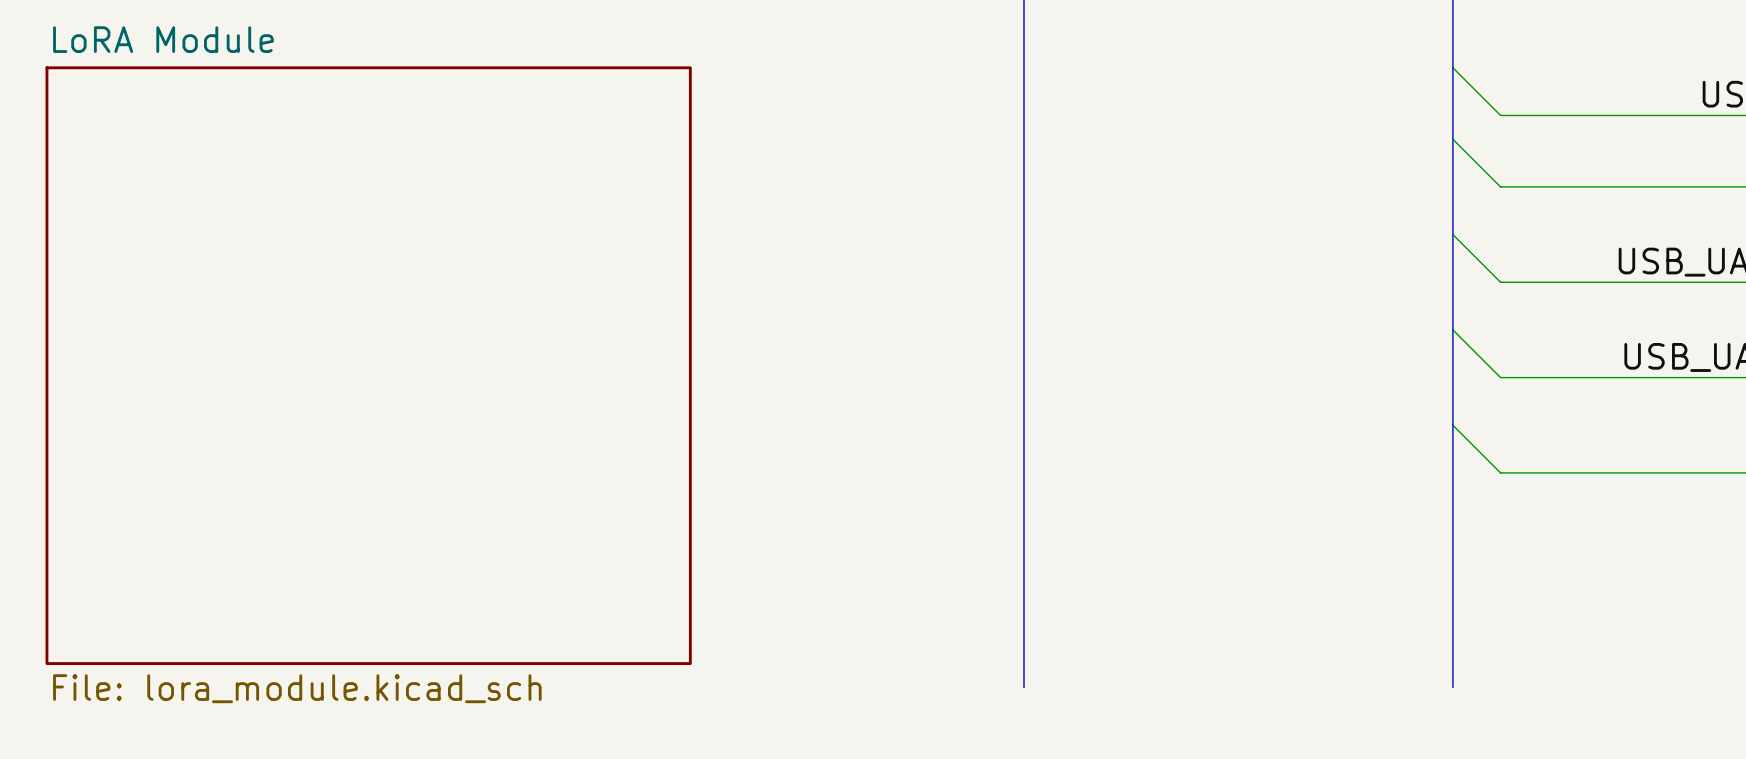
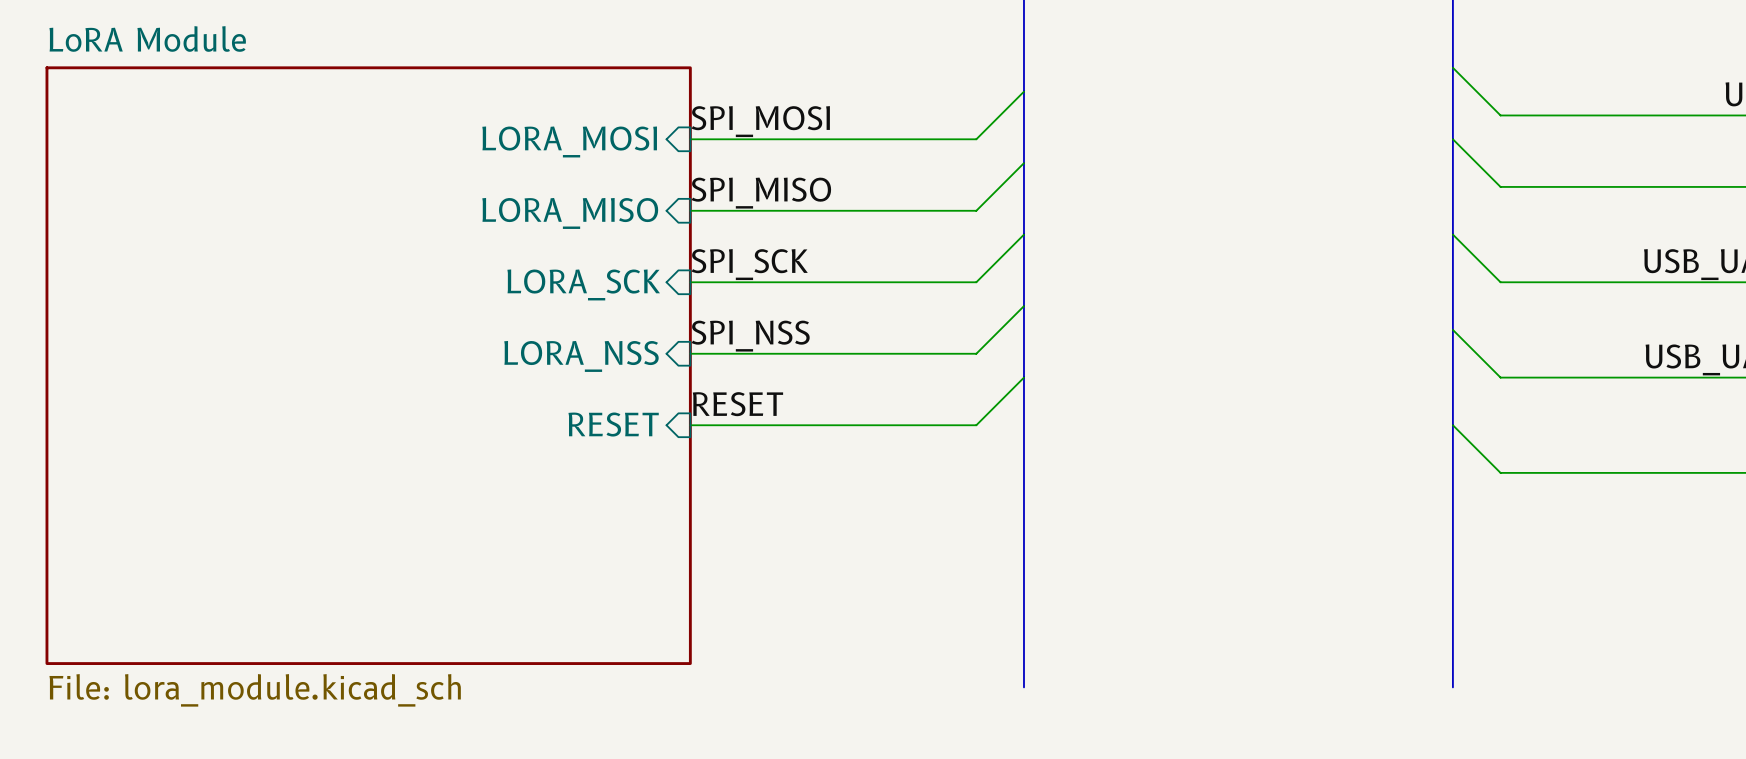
wire: none -> (1023, 91) (976, 139) (690, 139)
label: none -> SPI_MOSI (760, 121)
sheet pin: none -> LORA_MOSI (569, 141)
wire: none -> (1023, 163) (976, 210) (690, 210)
label: none -> SPI_MISO (761, 193)
sheet pin: none -> LORA_MISO (570, 213)
wire: none -> (1023, 234) (976, 282) (690, 282)
label: none -> SPI_SCK (749, 264)
sheet pin: none -> LORA_SCK (583, 284)
wire: none -> (1023, 306) (976, 353) (690, 353)
label: none -> SPI_NSS (750, 336)
sheet pin: none -> LORA_NSS (581, 356)
wire: none -> (1023, 377) (976, 425) (690, 425)
label: none -> RESET (737, 404)
sheet pin: none -> RESET (613, 424)

